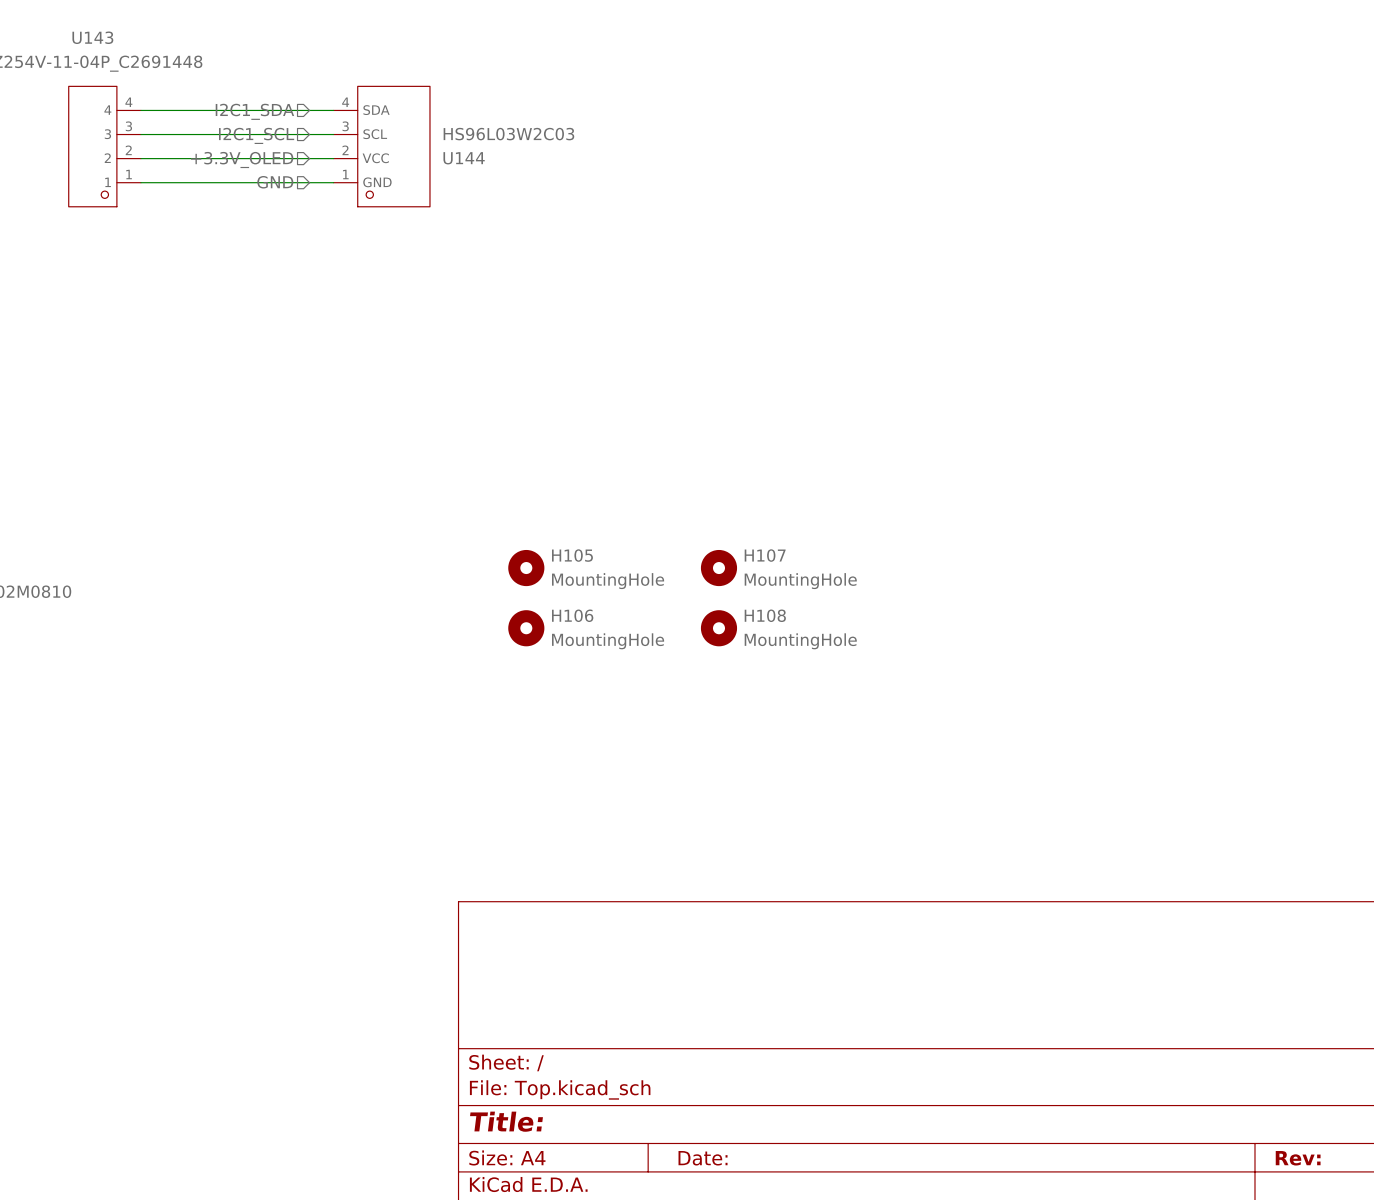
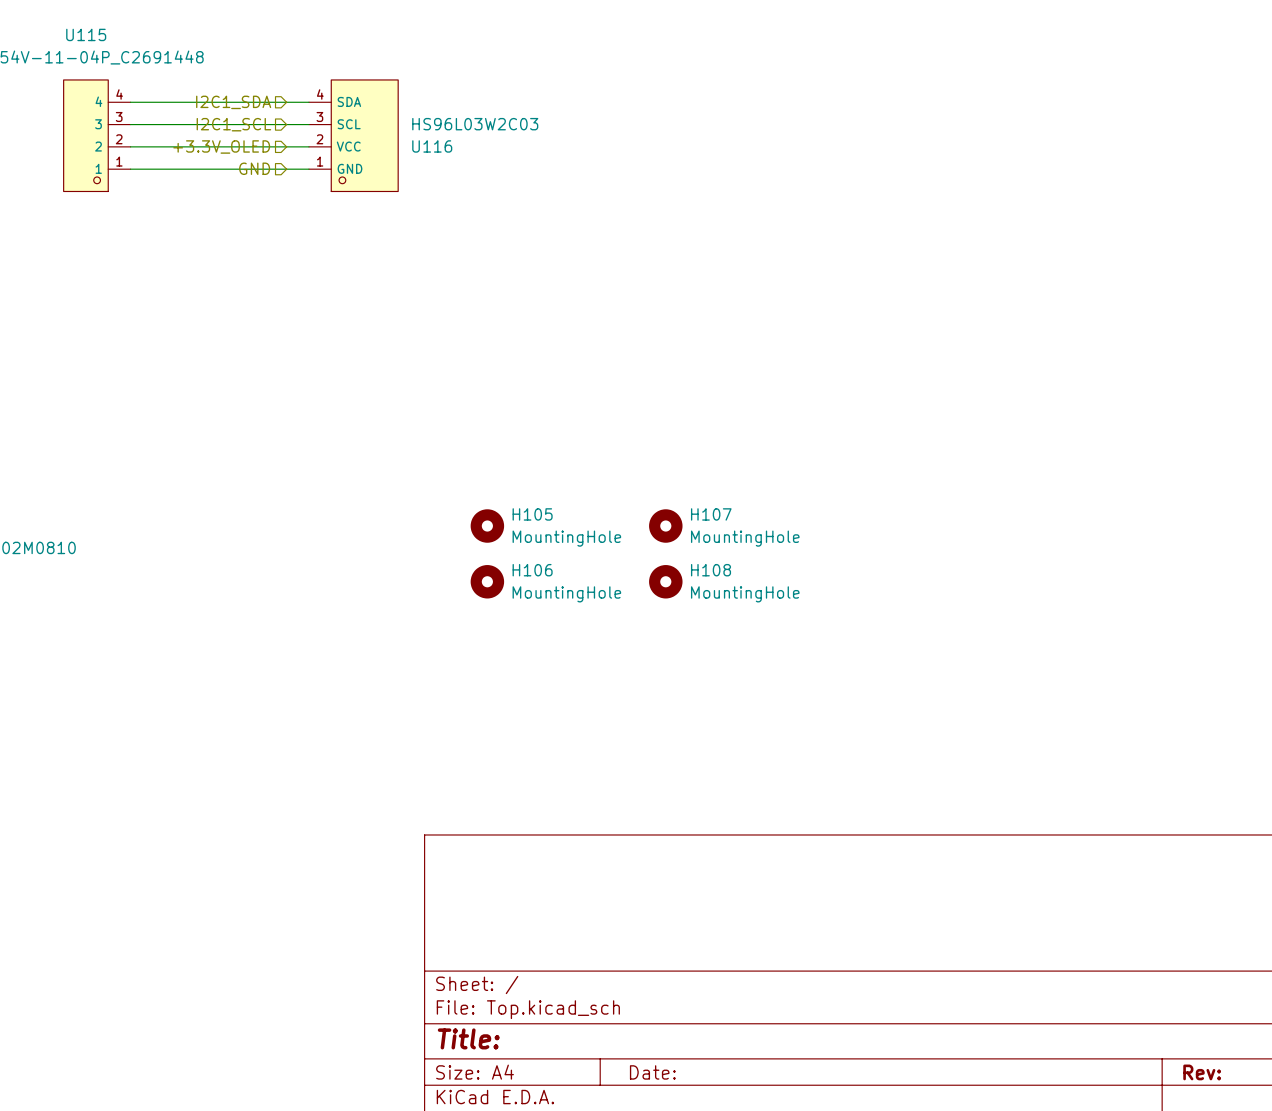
U143 name: U143 (92, 37) -> U115 (86, 34)
U144 name: U144 (464, 158) -> U116 (432, 146)

